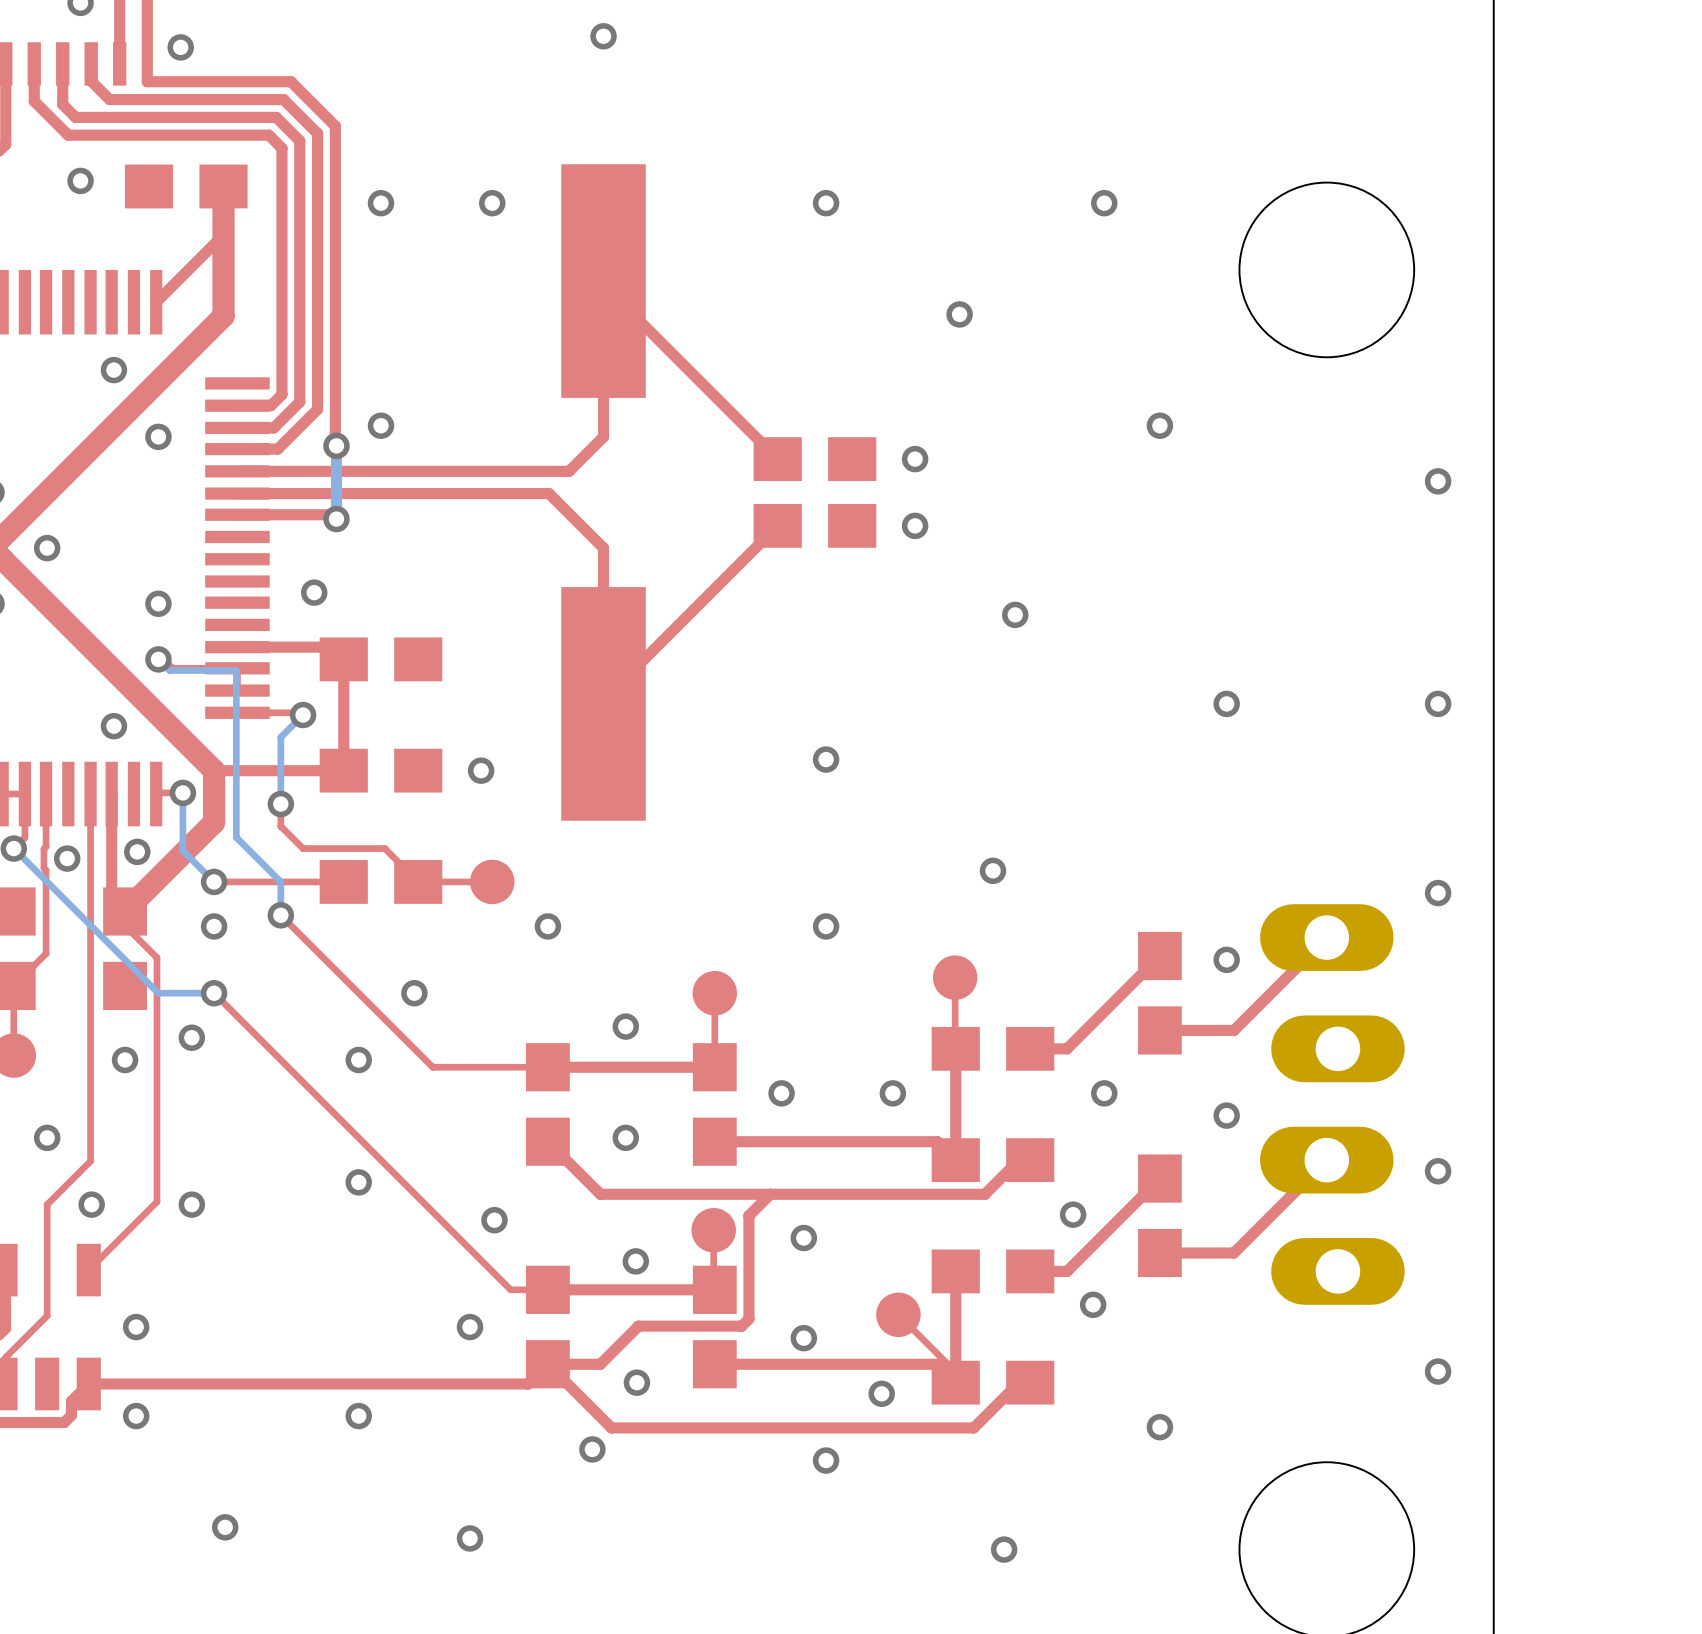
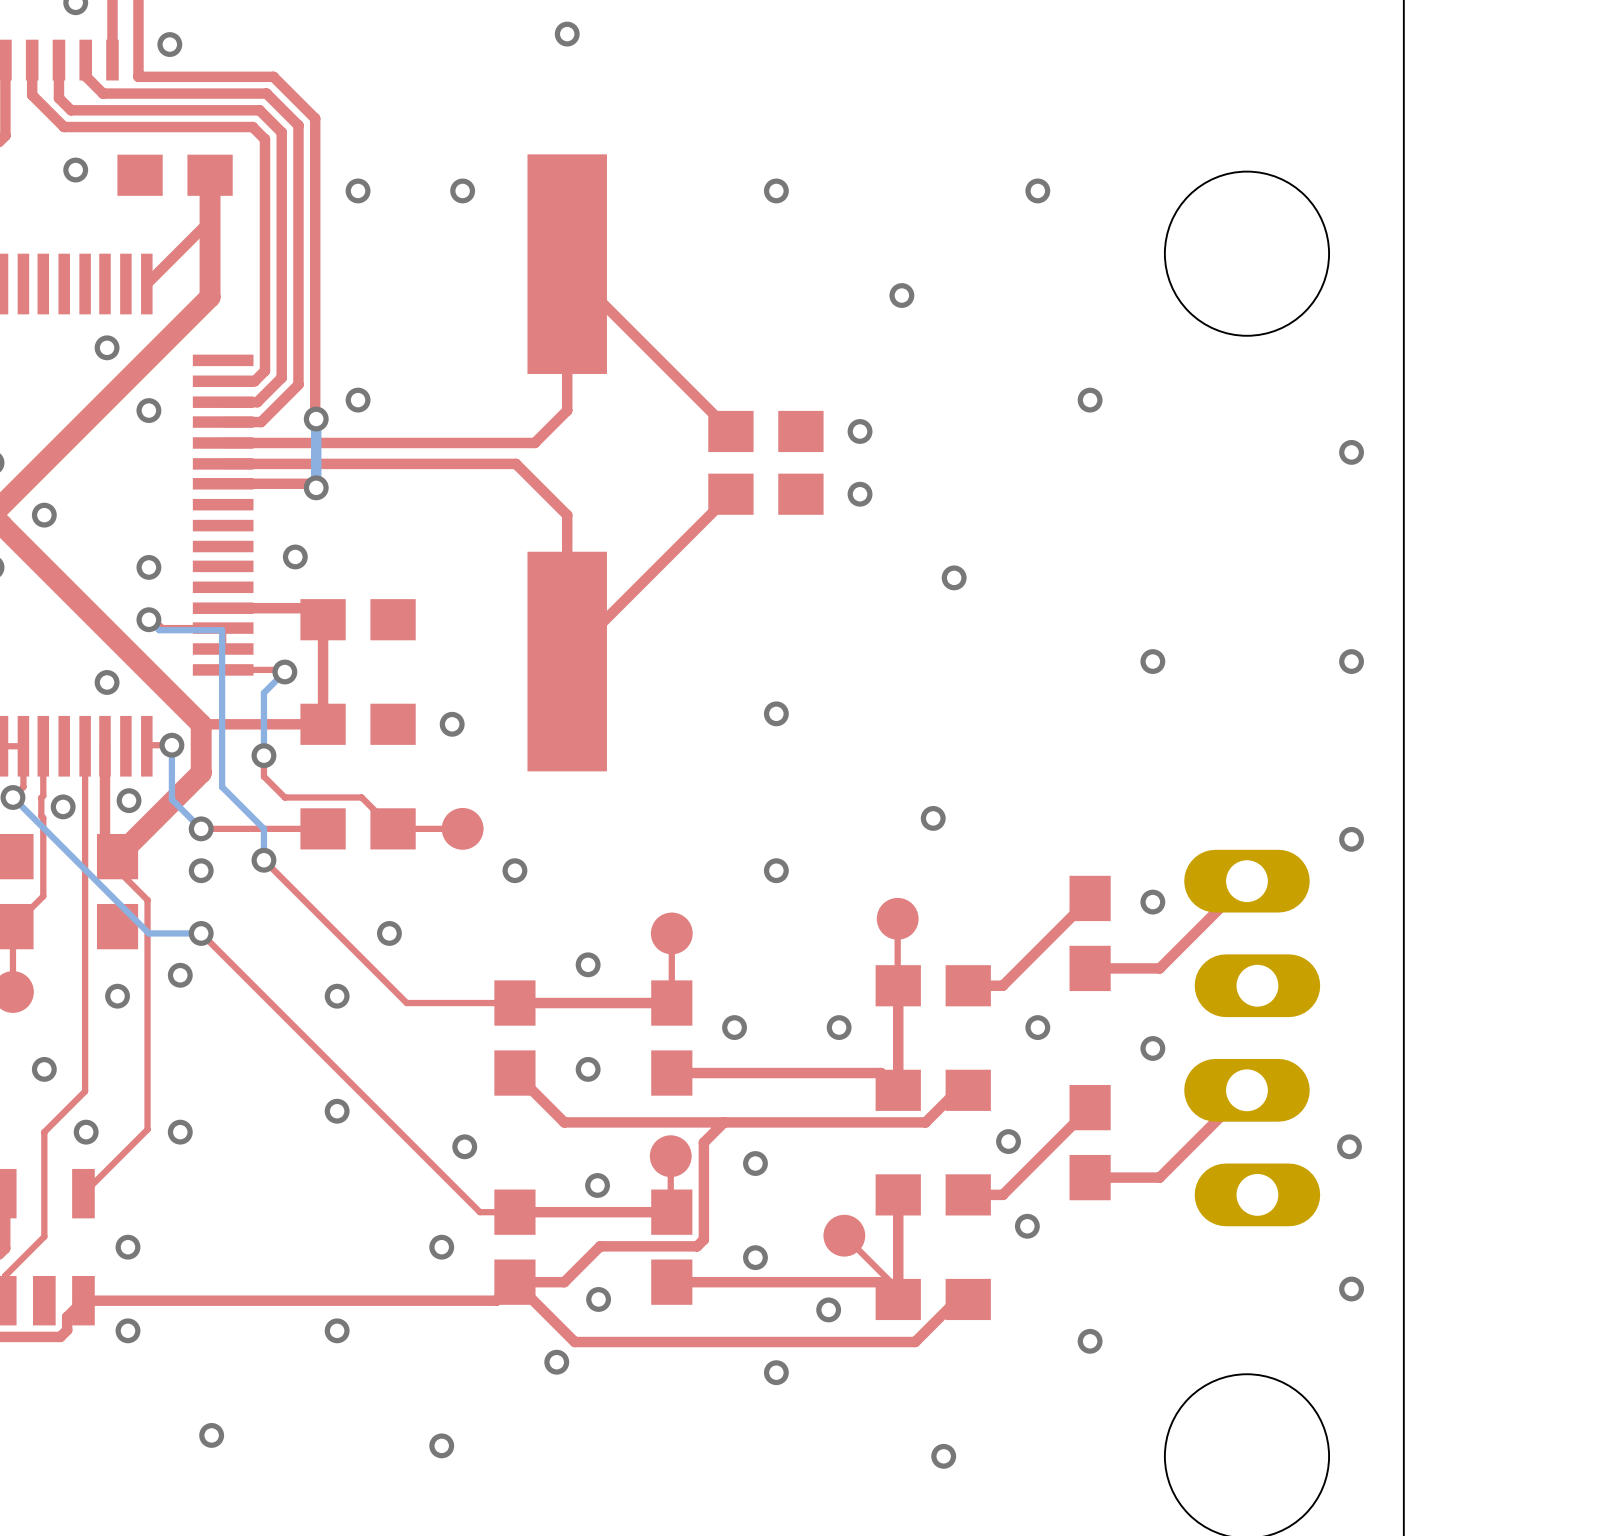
via position: (1438, 1171) -> (1349, 1146)

